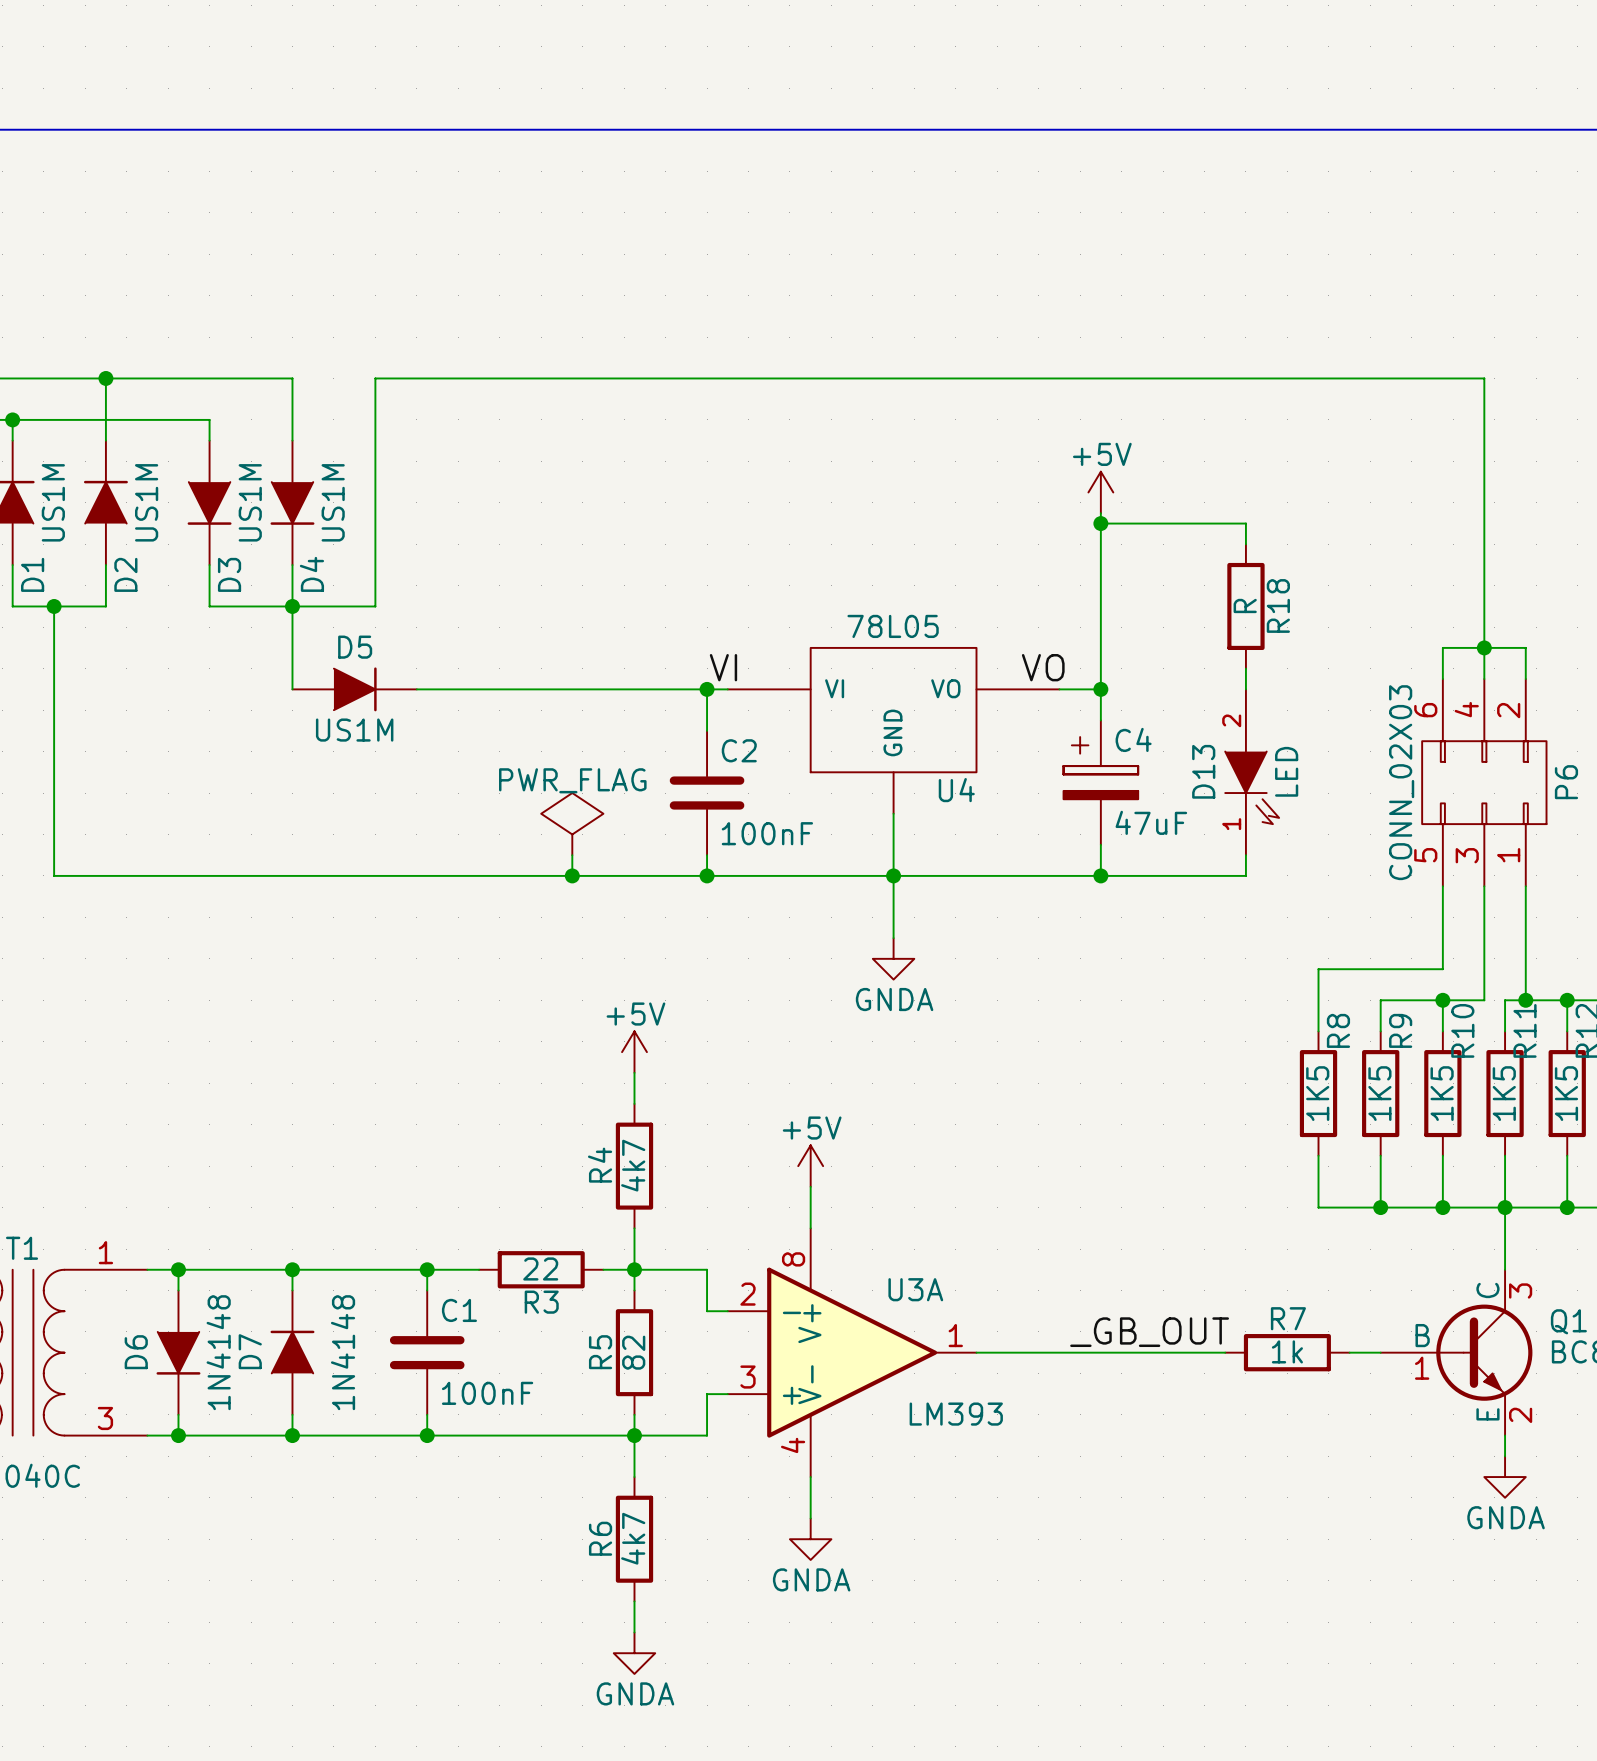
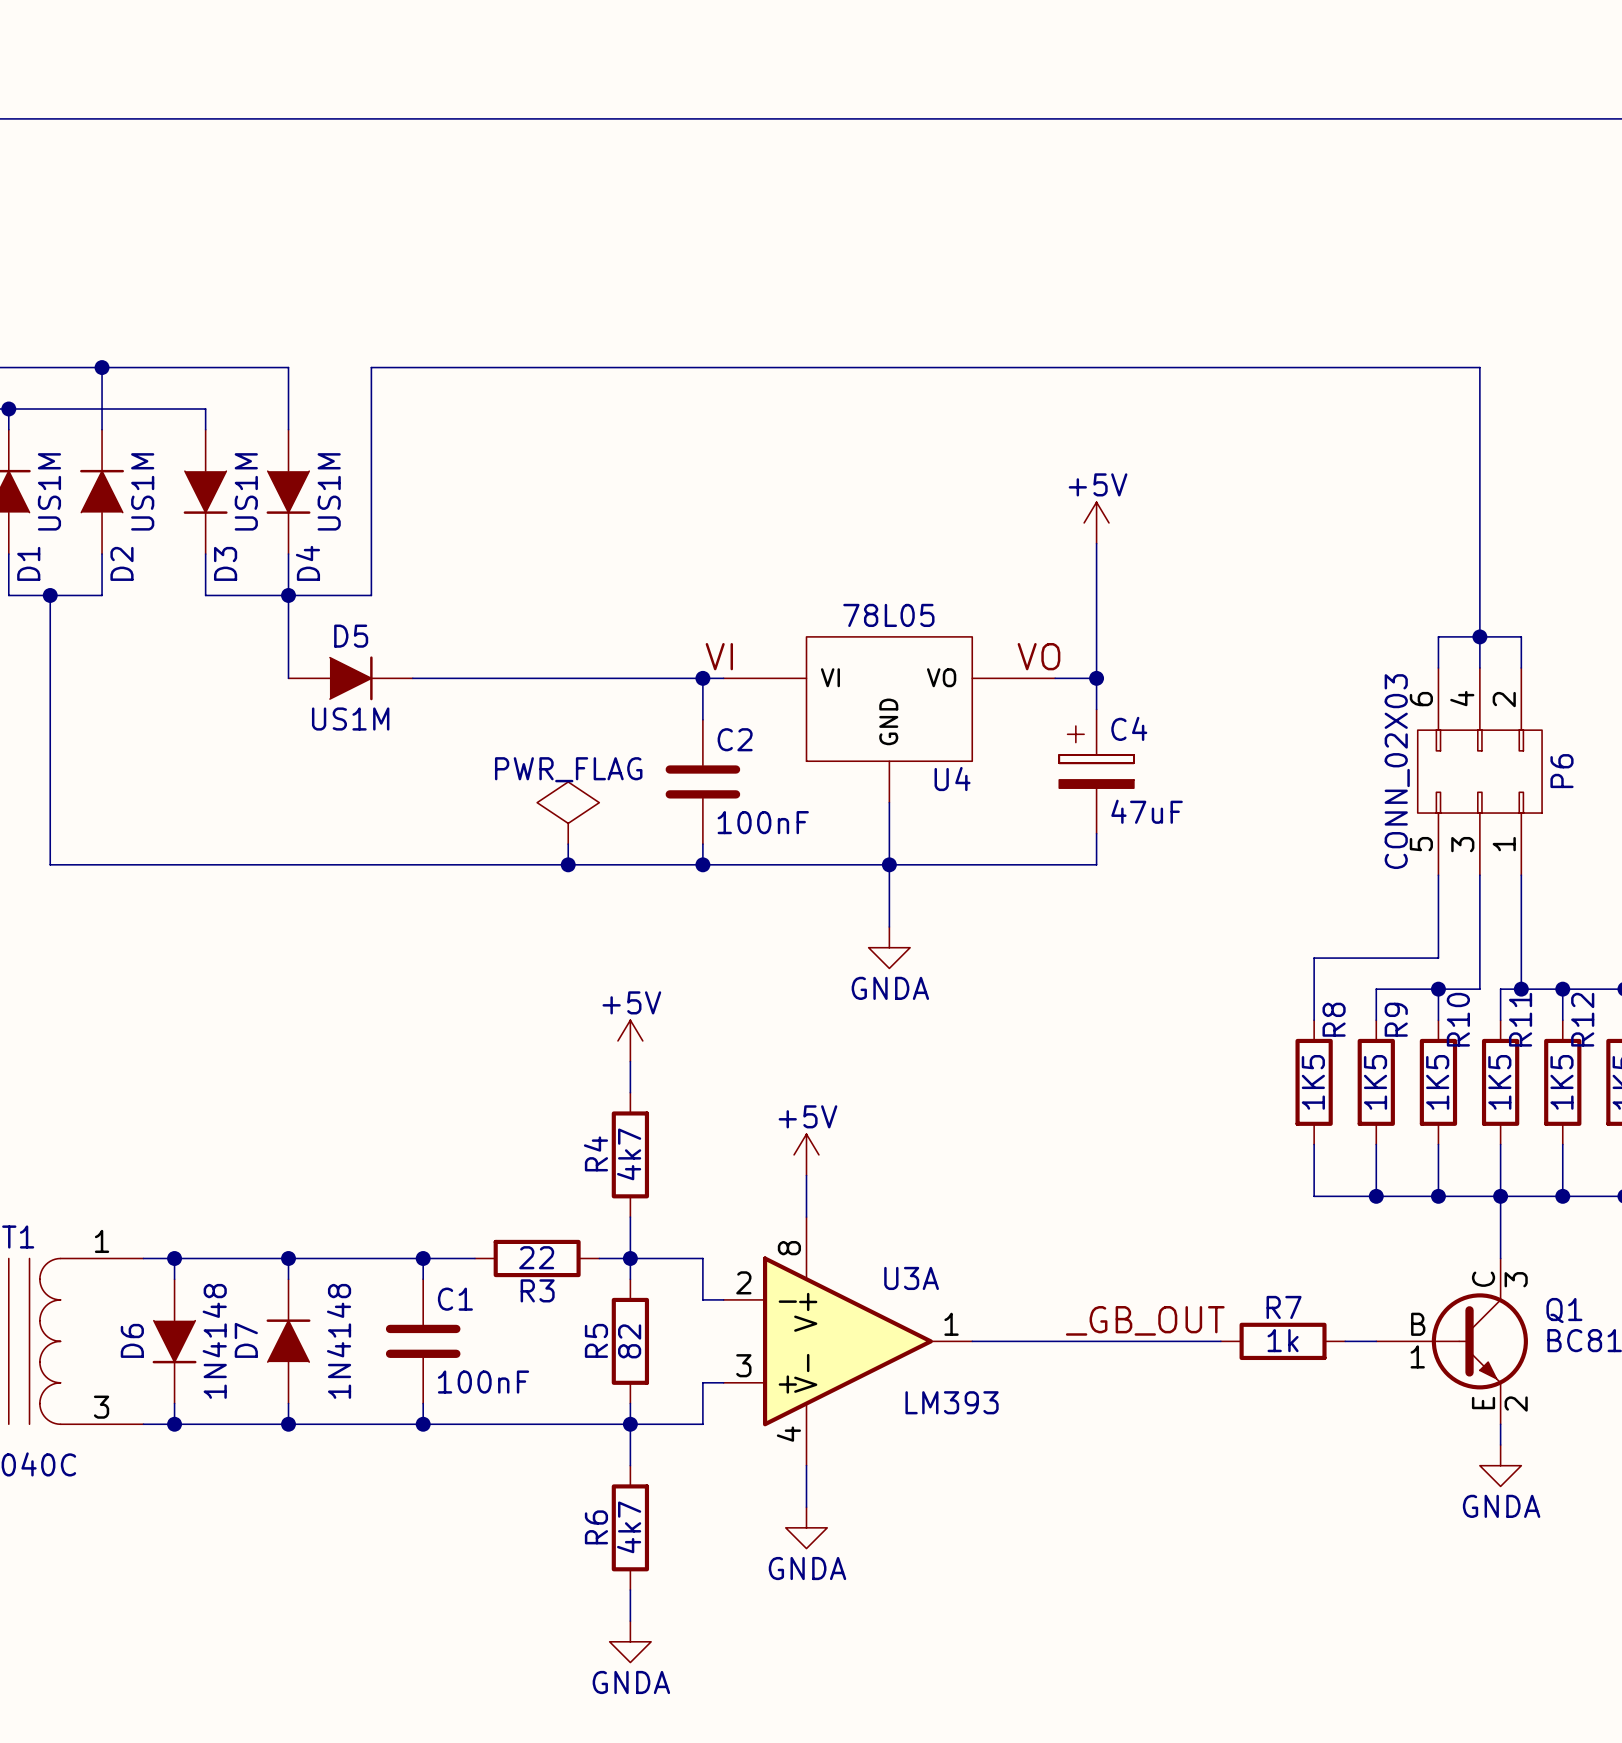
power symbol position: +5V (1100, 492) -> +5V (1096, 522)
wire: (1100, 523) (1245, 523) (1245, 544) -> none
junction: (1100, 523) -> none
R18: R (1245, 606) -> none
wire: (1245, 668) (1245, 689) -> none
D13: LED (1252, 772) -> none
wire: (1245, 855) (1245, 875) (1100, 875) -> none
junction: (1100, 875) -> none

